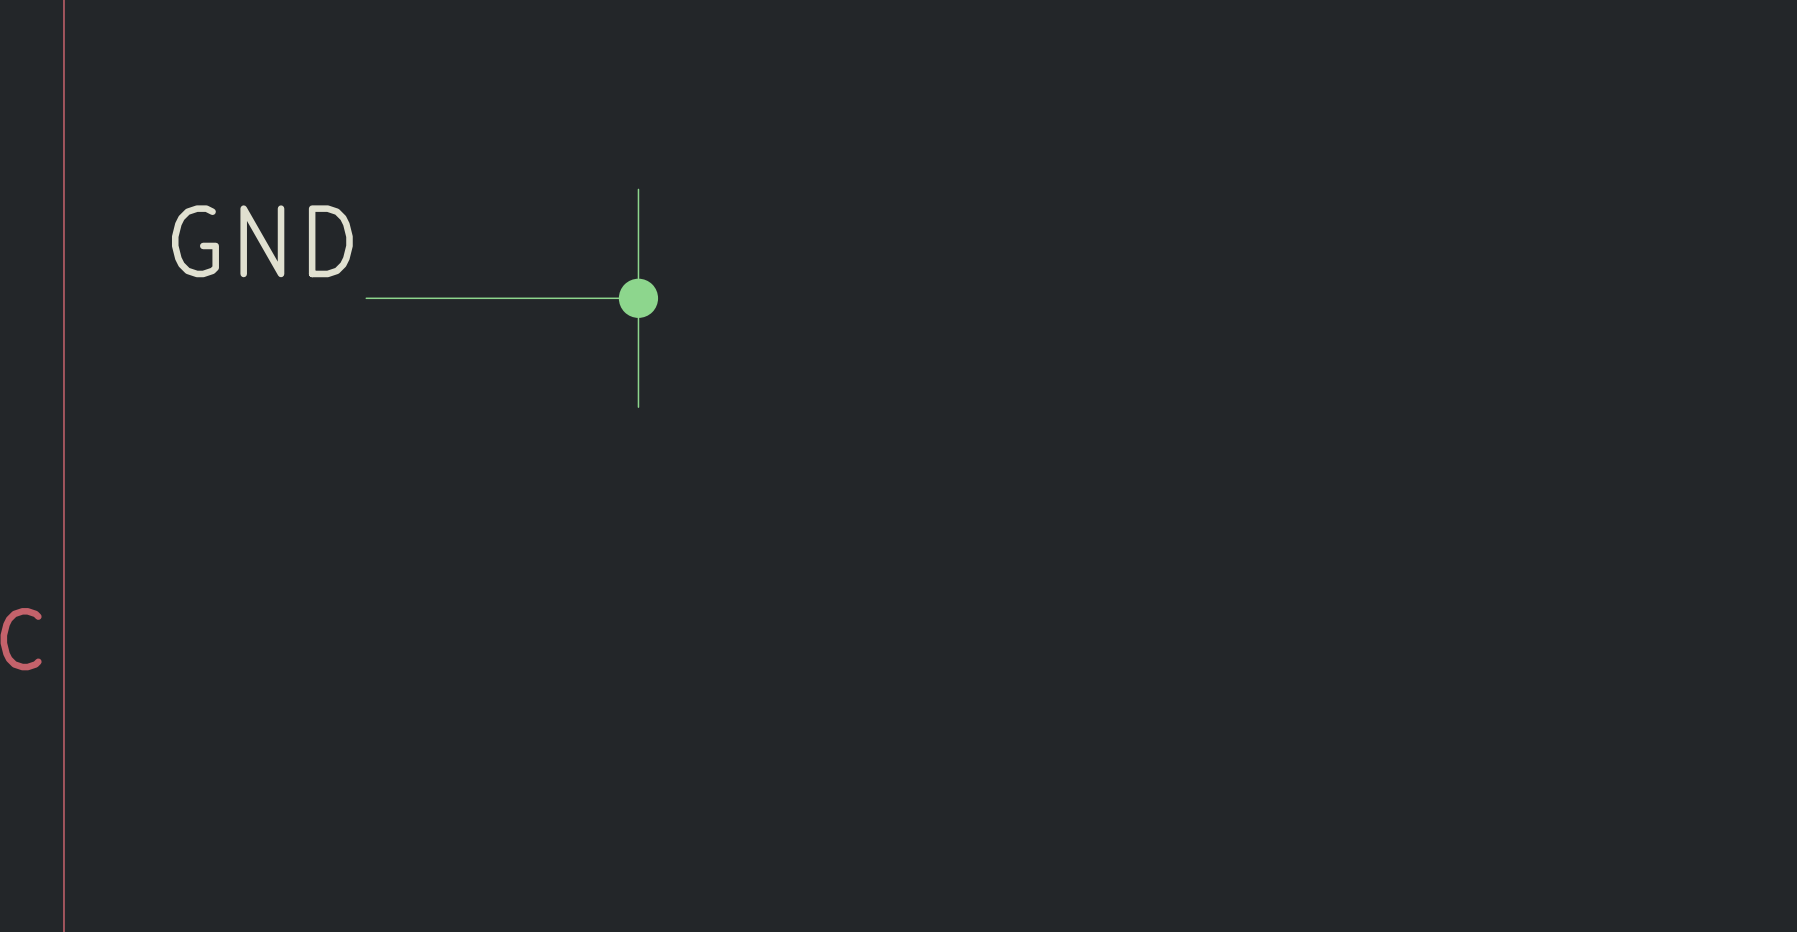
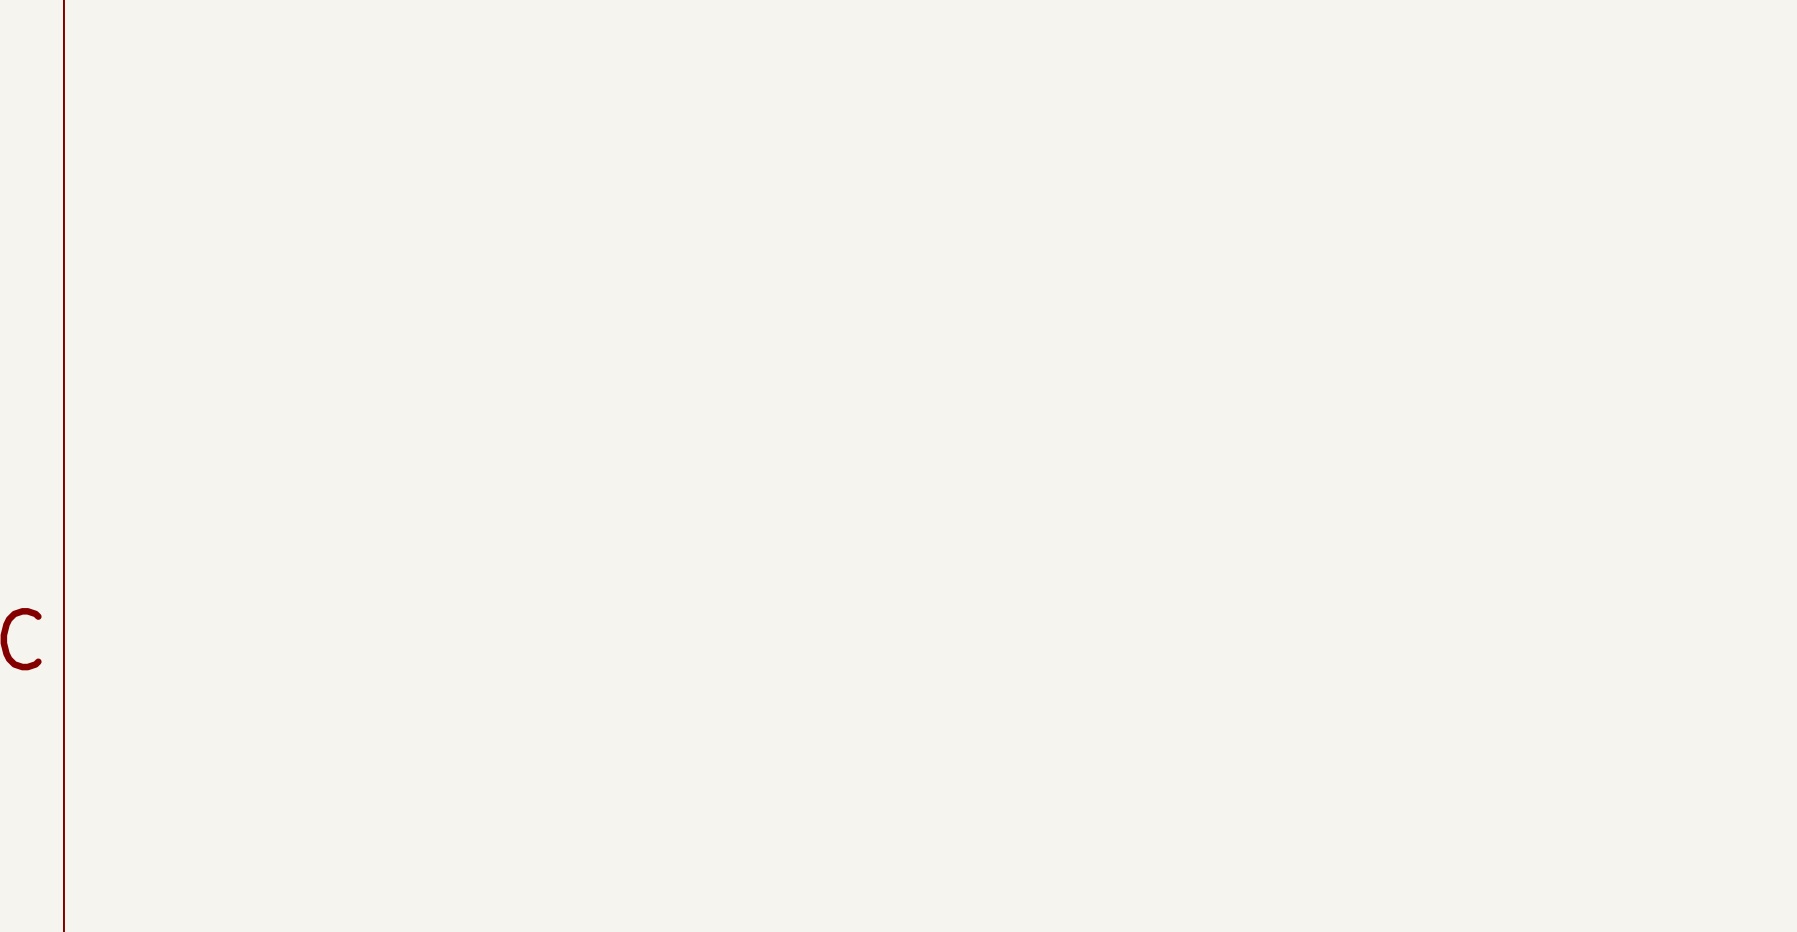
wire: (638, 189) (638, 407) -> none
label: GND (262, 241) -> none
wire: (366, 298) (638, 298) -> none
junction: (638, 298) -> none

